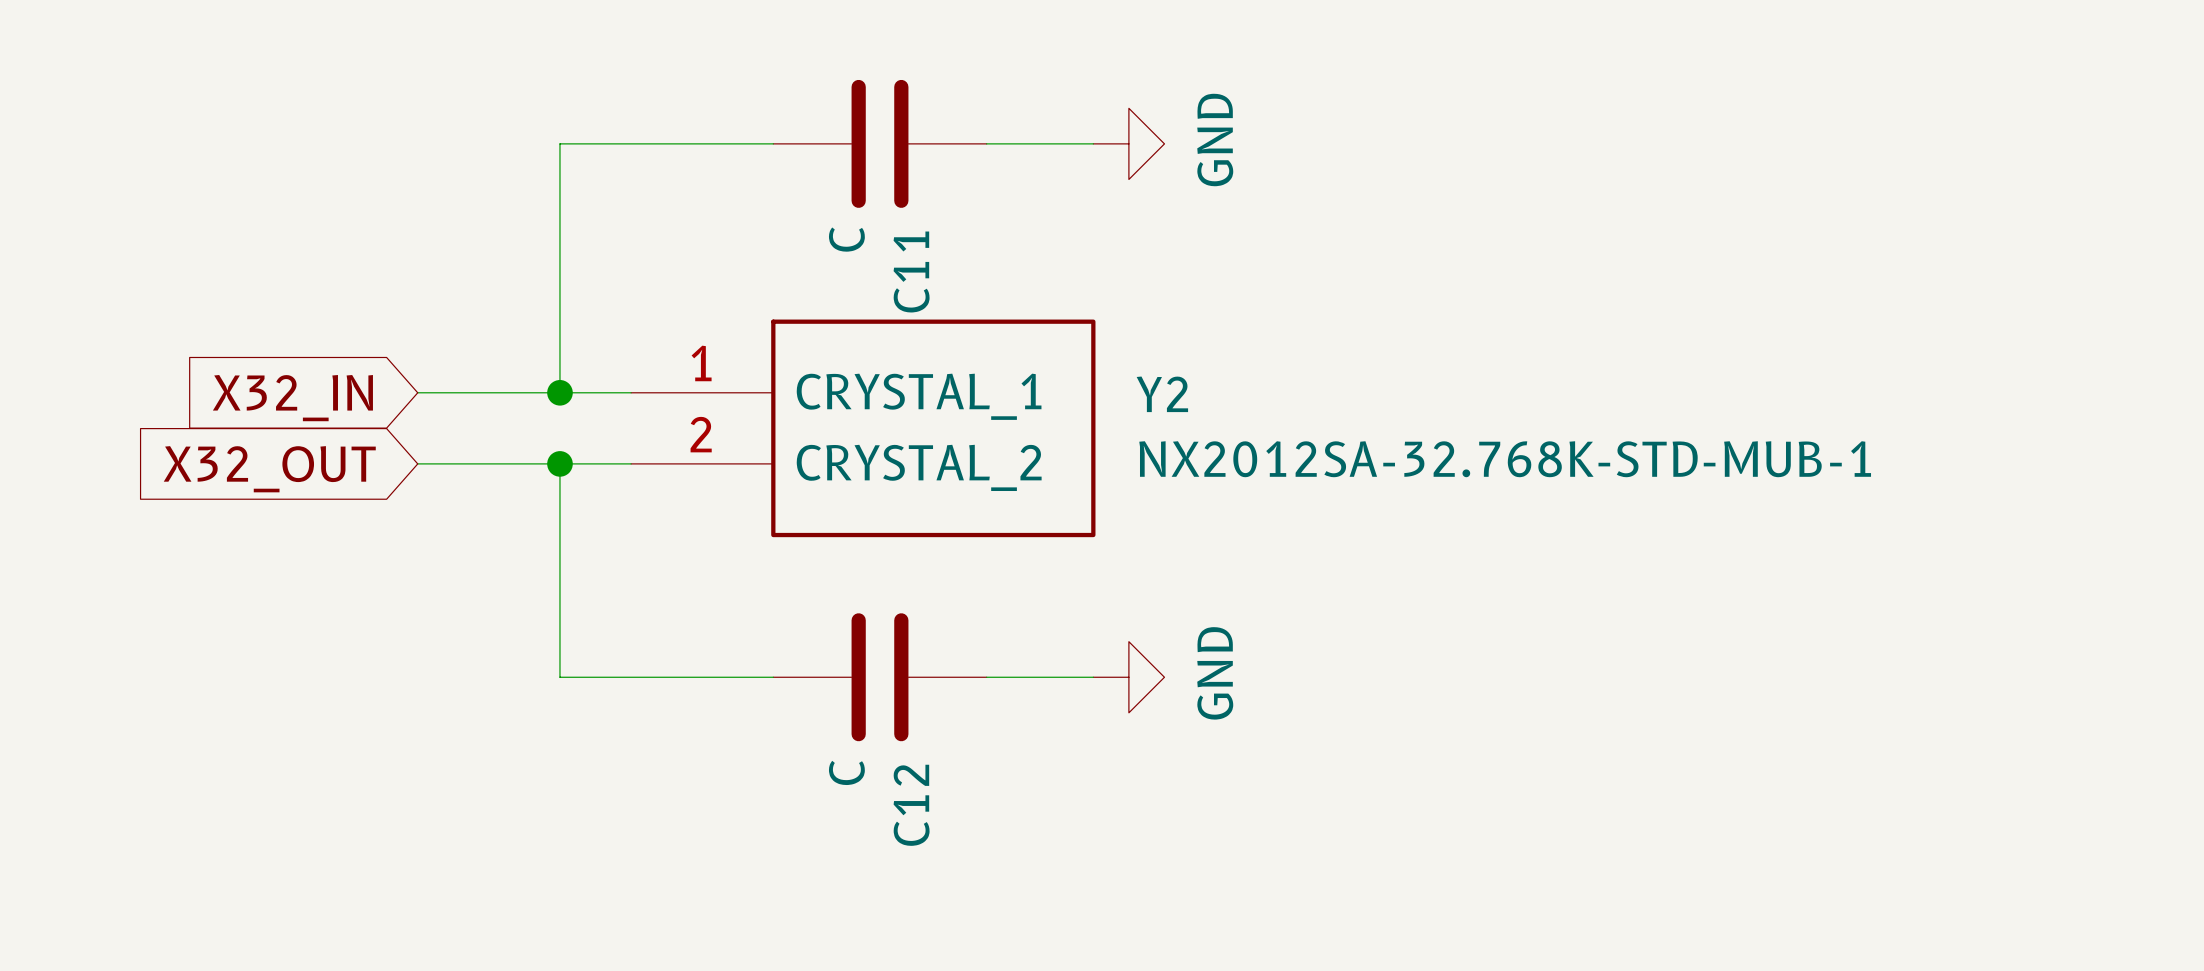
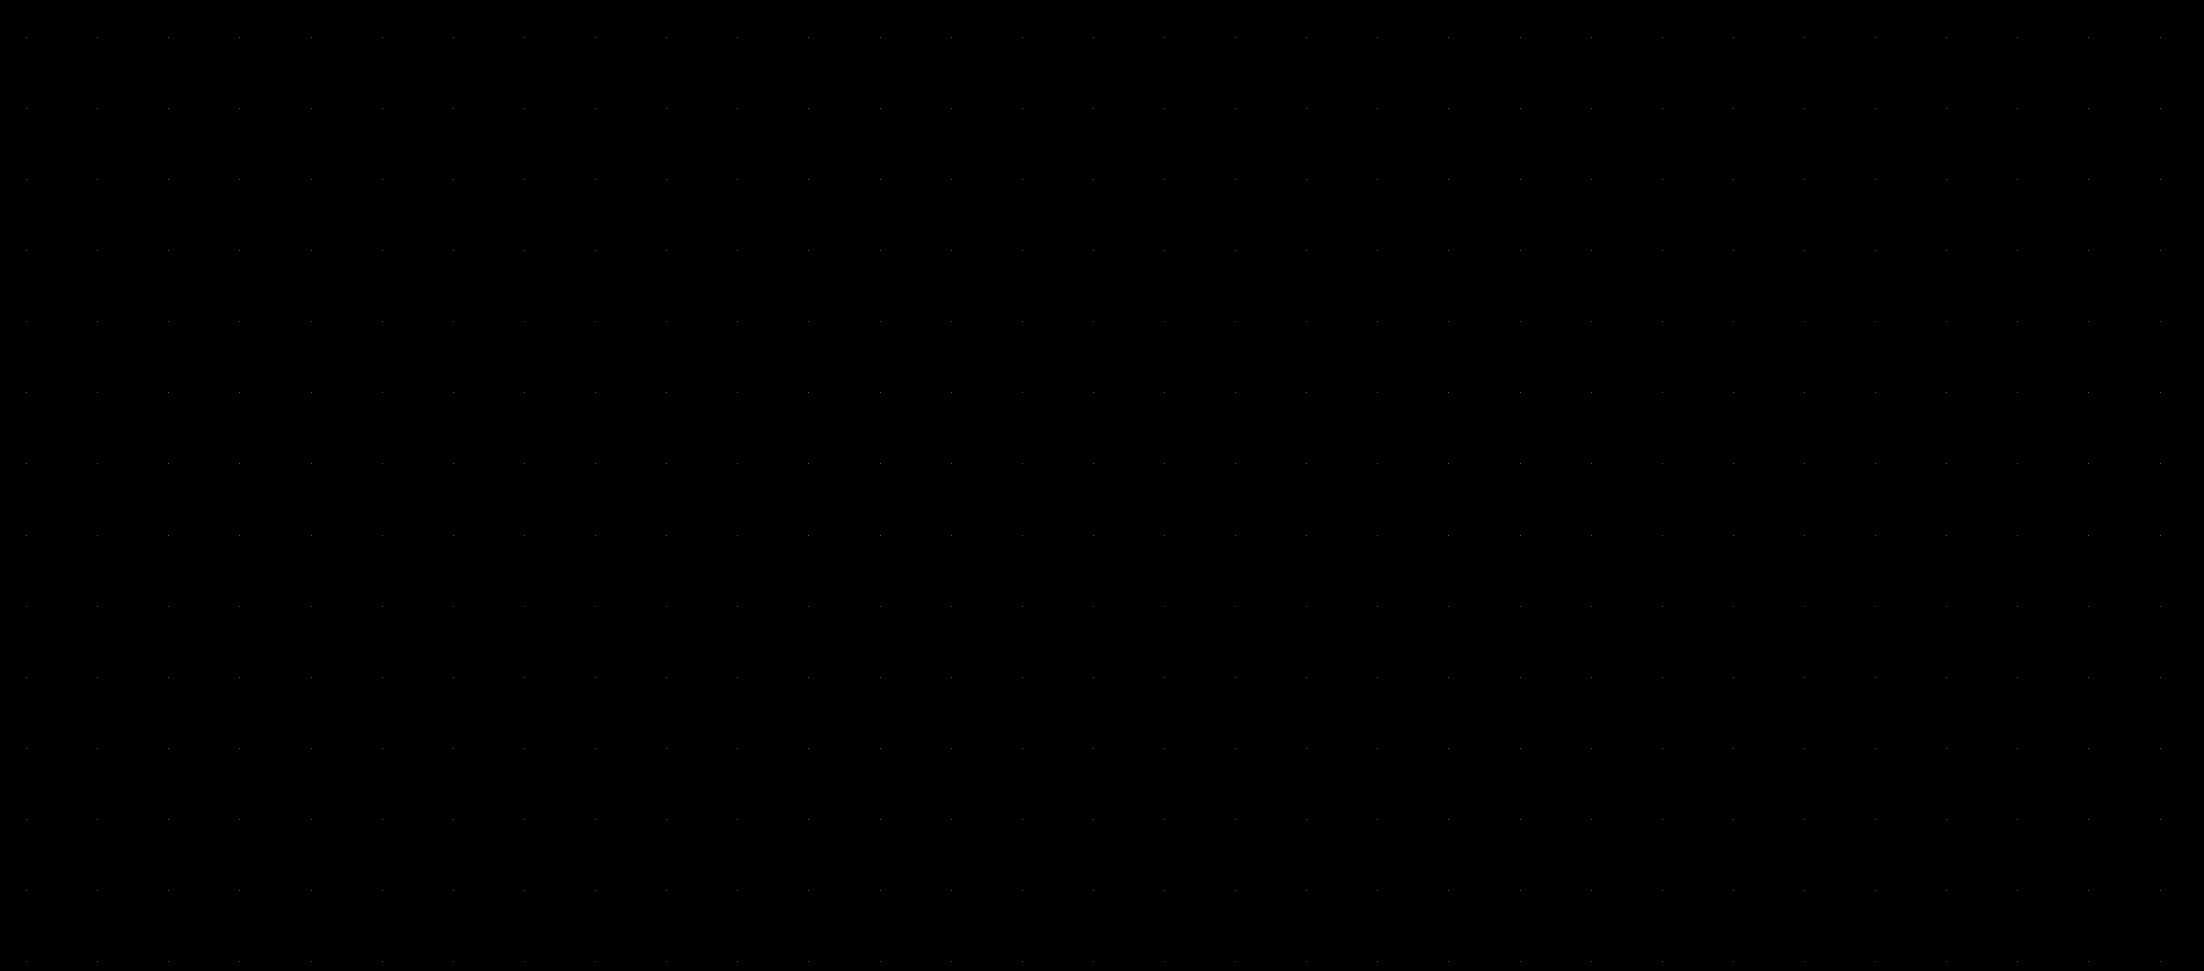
wire: (773, 143) (559, 143) (559, 392) -> none
C11: C (880, 143) -> none
wire: (986, 143) (1093, 143) -> none
power symbol: GND (1128, 143) -> none
wire: (417, 392) (631, 392) -> none
junction: (559, 392) -> none
global label: X32_IN (292, 398) -> none
Y2: NX2012SA-32.768K-STD-MUB-1 (863, 428) -> none
wire: (417, 463) (631, 463) -> none
wire: (559, 463) (559, 677) (773, 677) -> none
junction: (559, 463) -> none
global label: X32_OUT (269, 469) -> none
C12: C (880, 677) -> none
wire: (986, 677) (1093, 677) -> none
power symbol: GND (1128, 677) -> none

